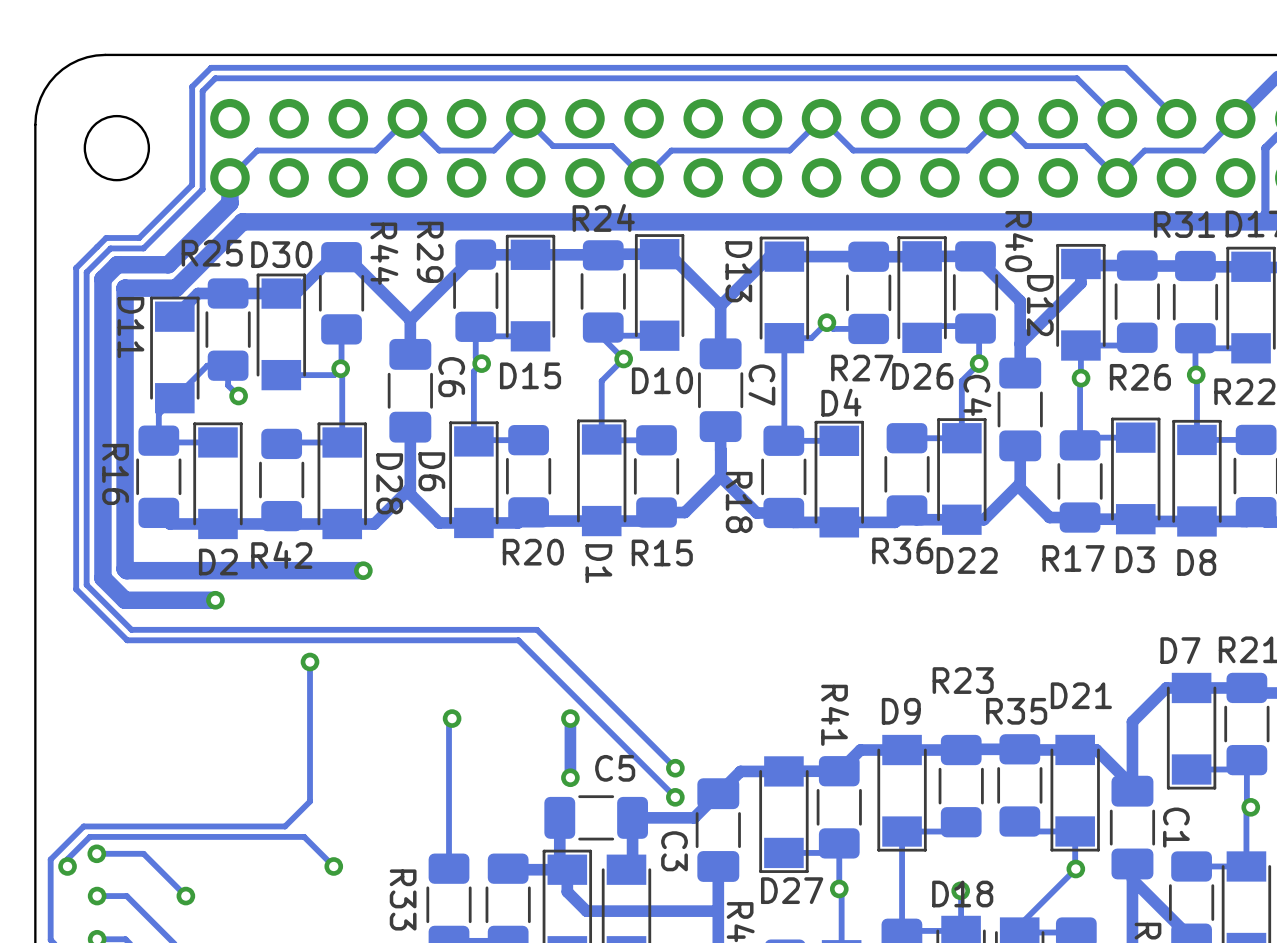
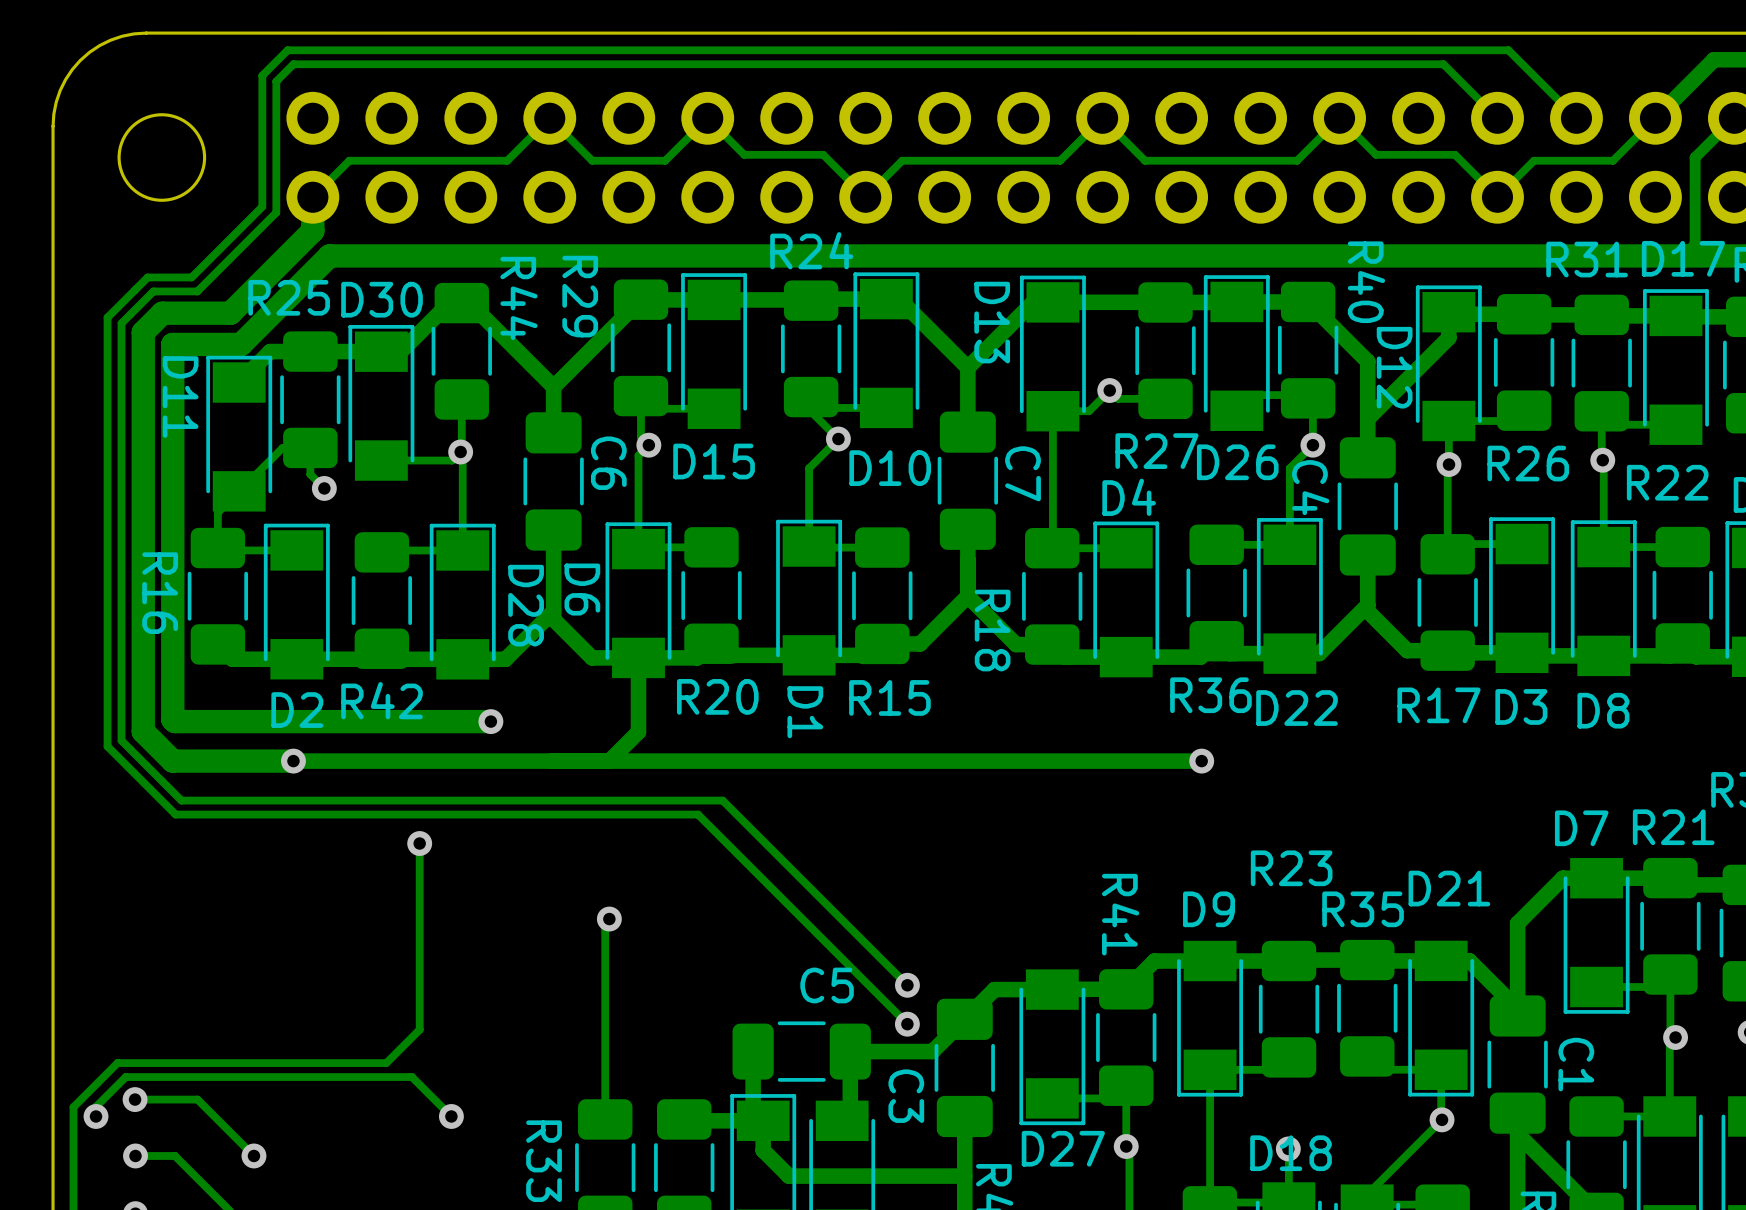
track: none -> (638, 657) (638, 731) (609, 761)
track: none -> (1201, 761) (293, 761)
via: none -> (1201, 761)
track: (570, 718) (570, 777) -> none
via: (570, 718) -> none
via: (570, 777) -> none

